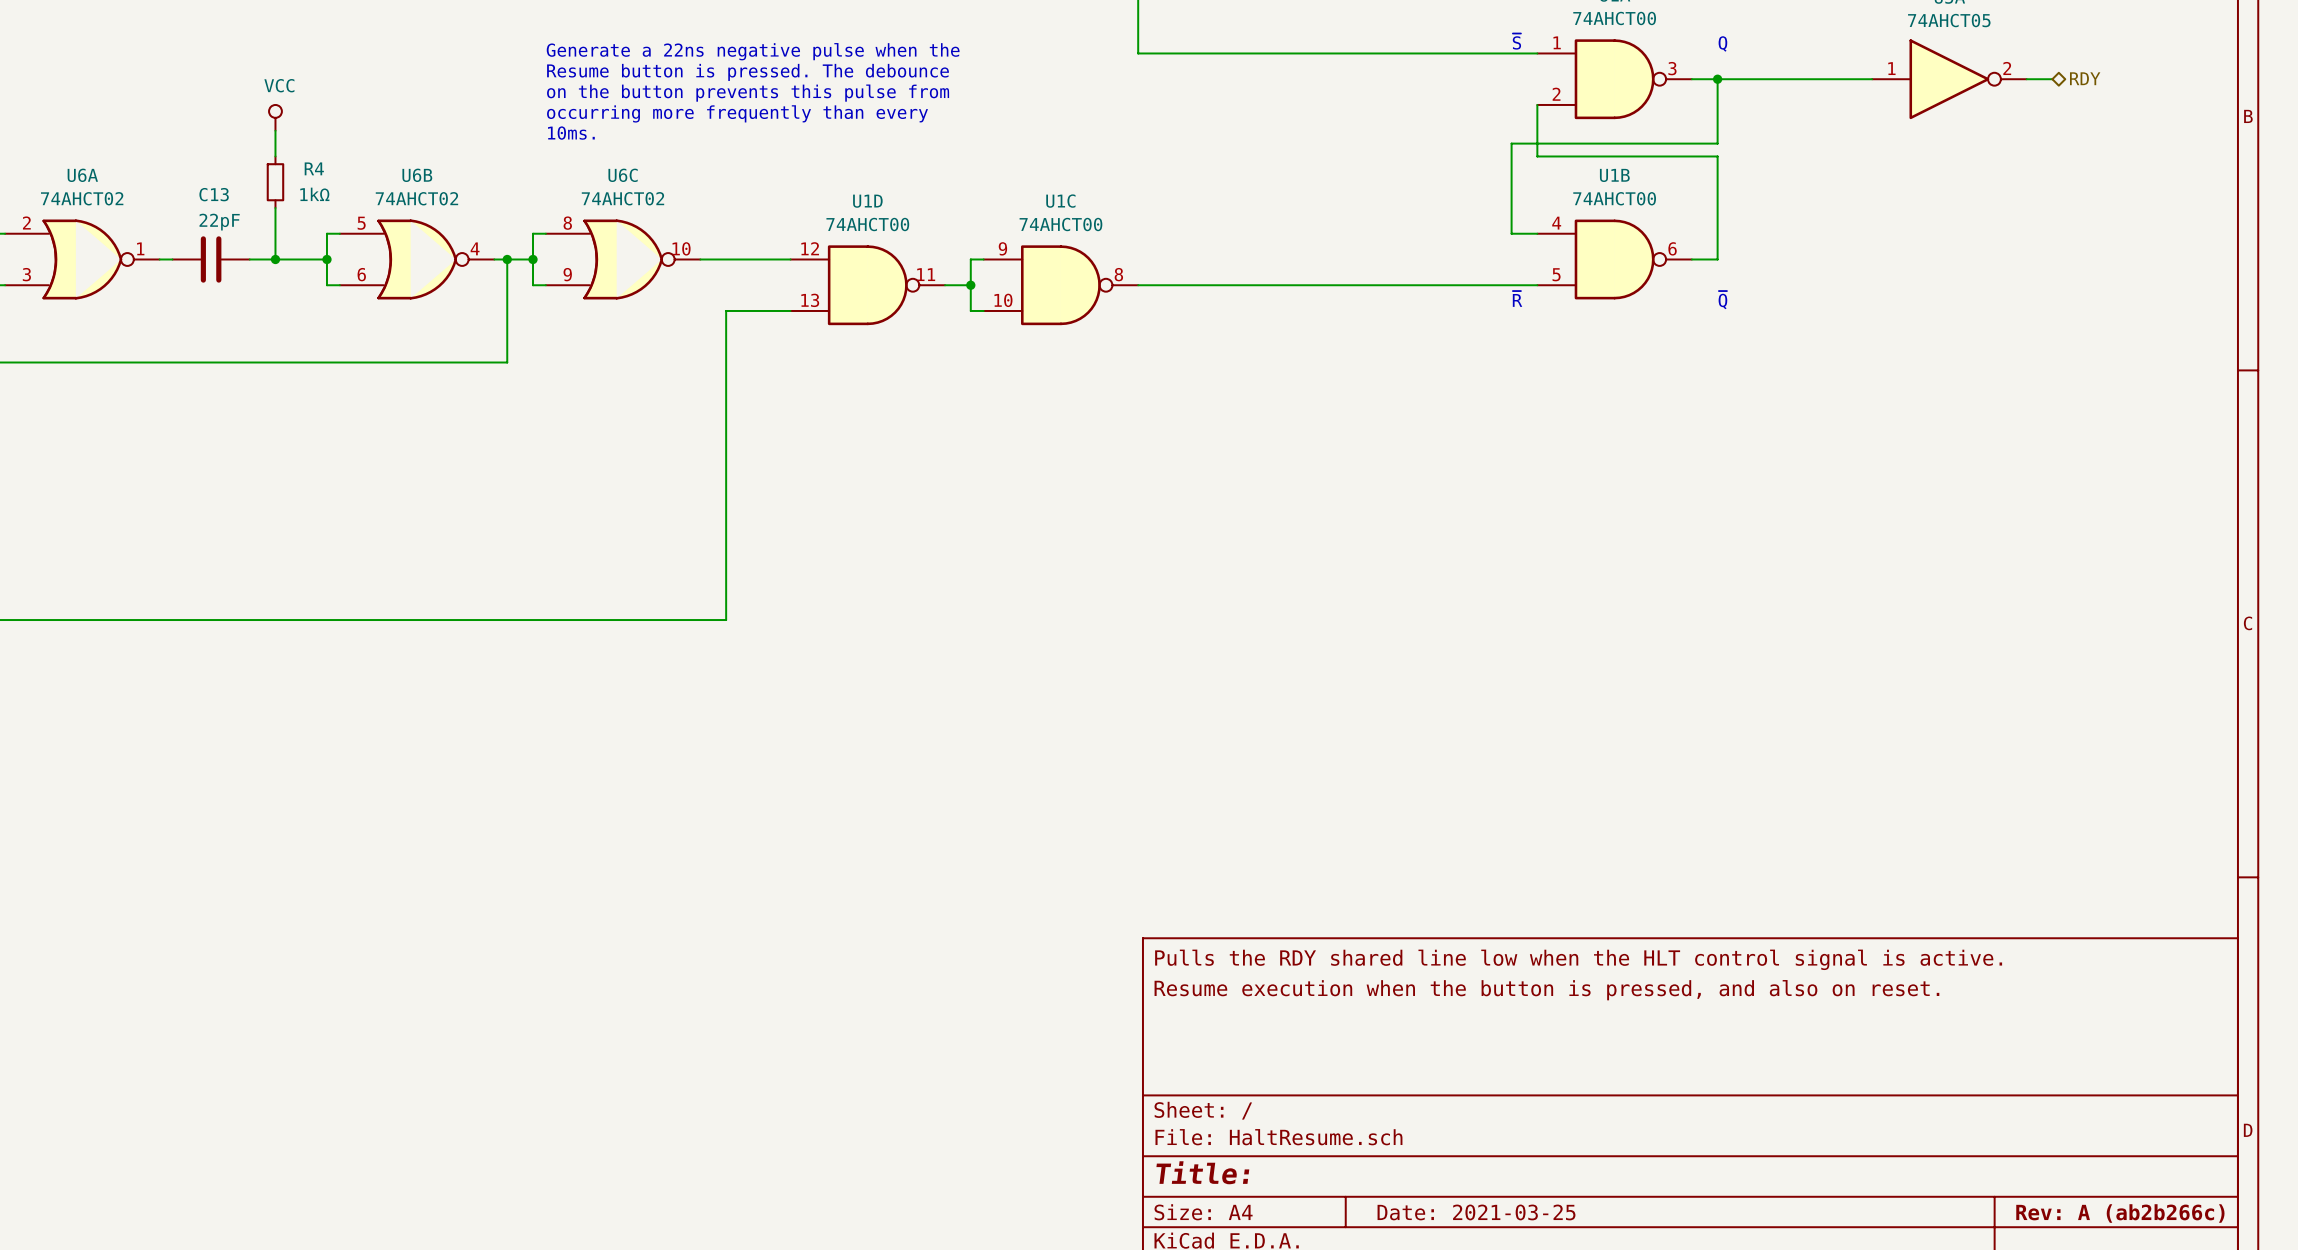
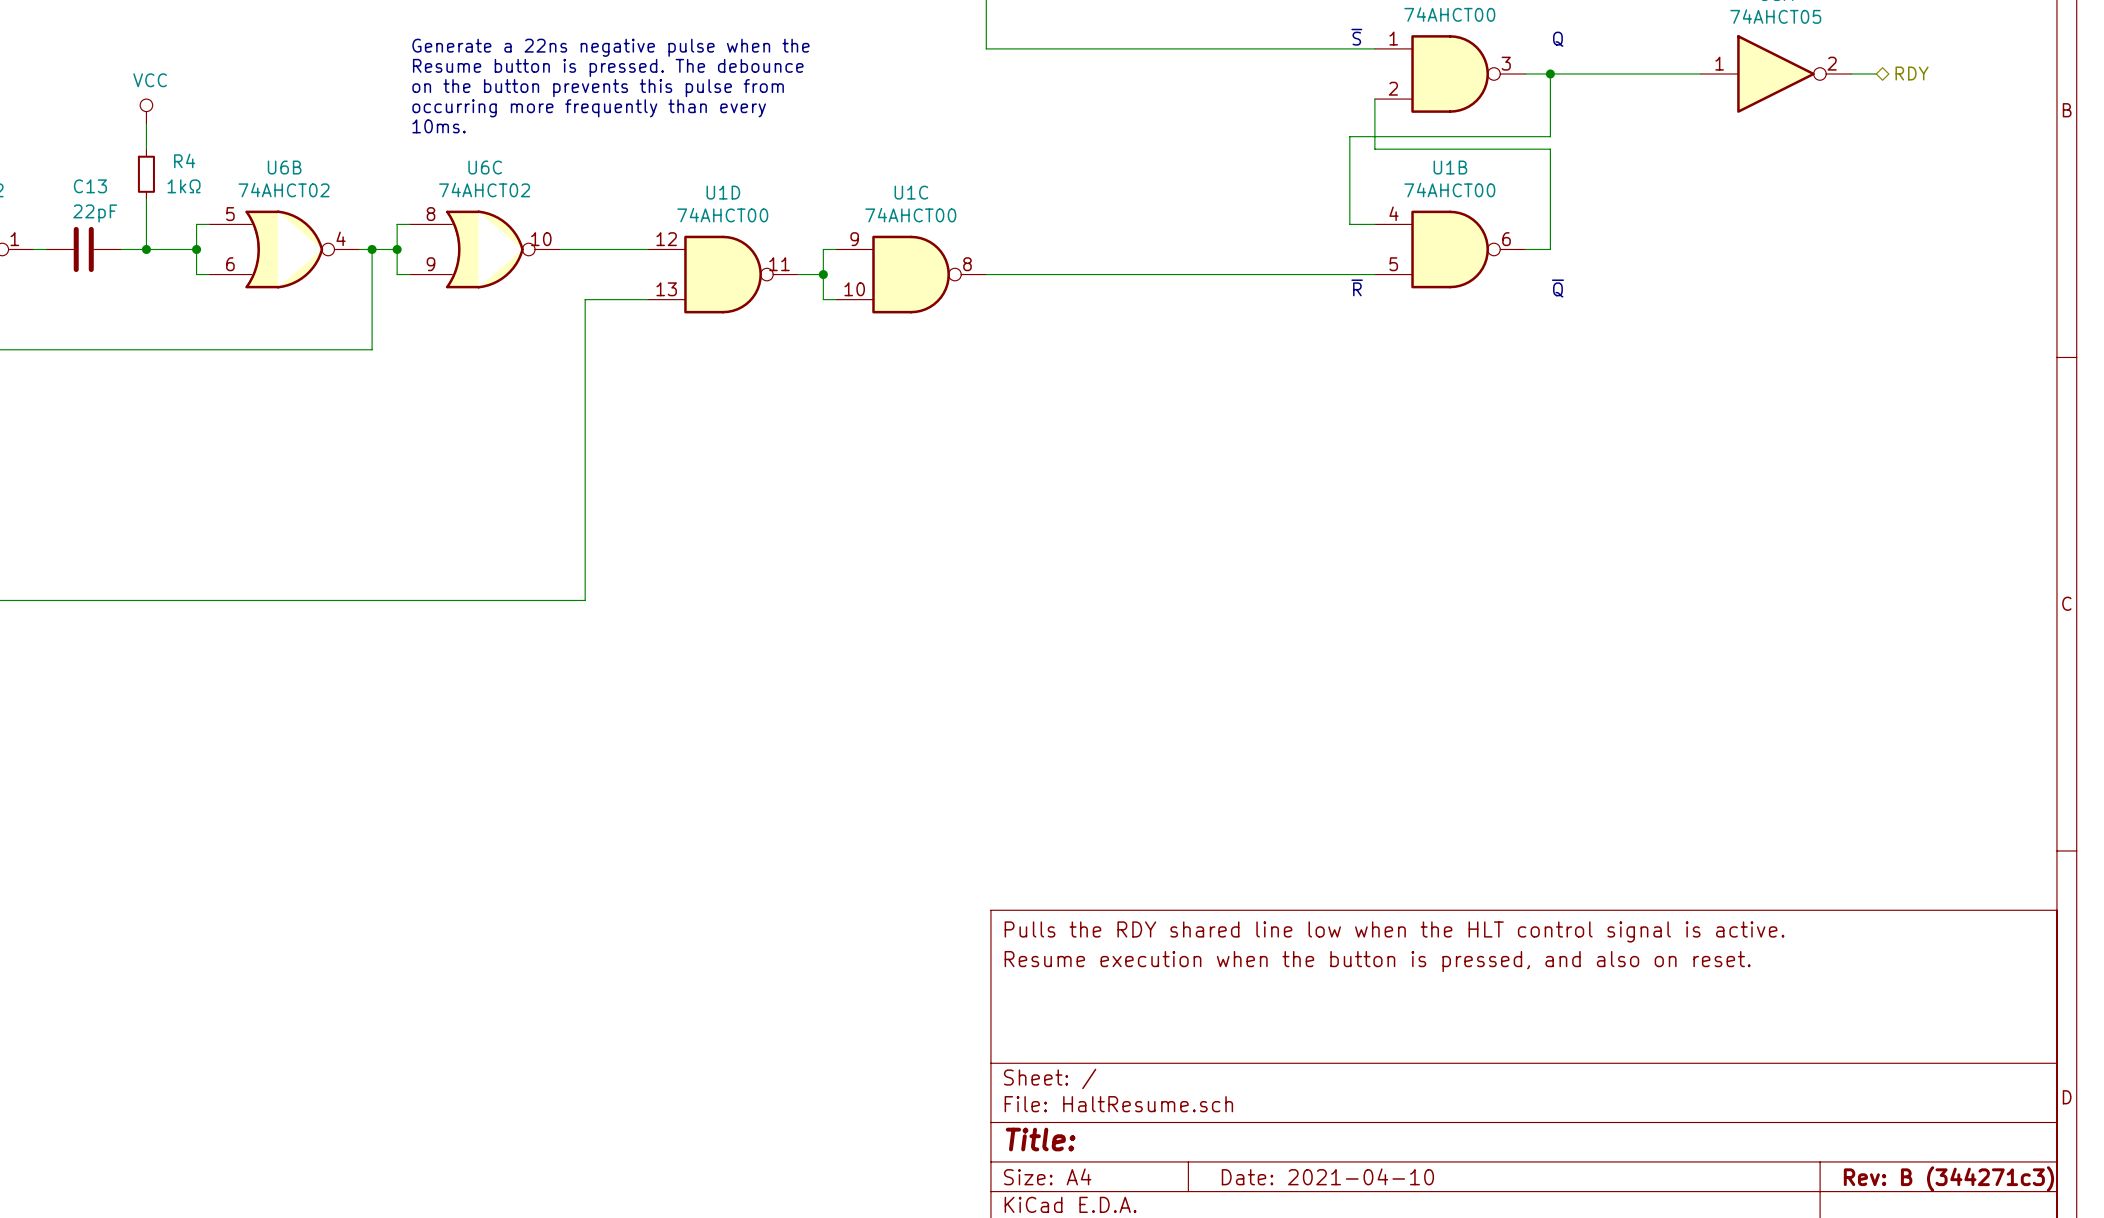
title block: Date: 2021-03-25 (1476, 1212) -> Date: 2021-04-10 (1327, 1176)
title block: Rev: A (ab2b266c) (2120, 1213) -> Rev: B (344271c3) (1948, 1178)

